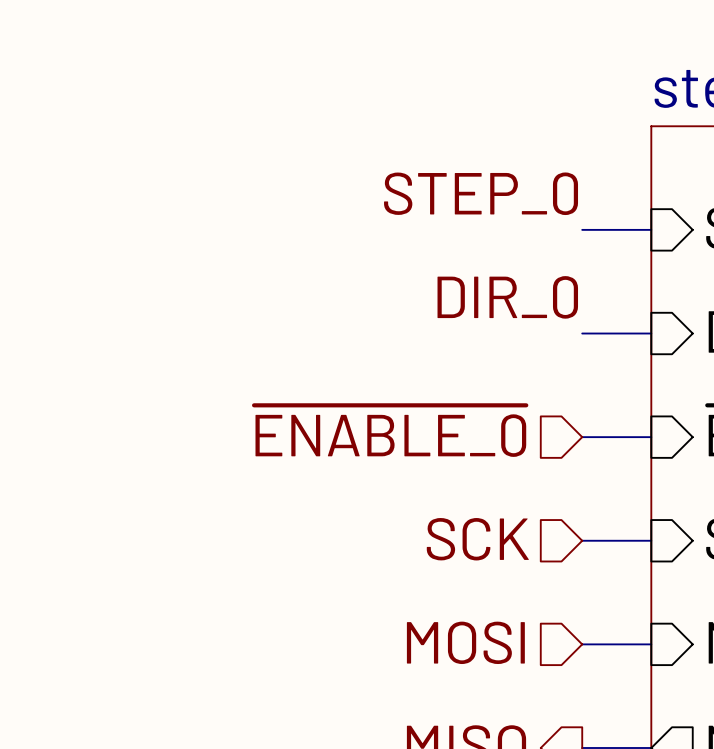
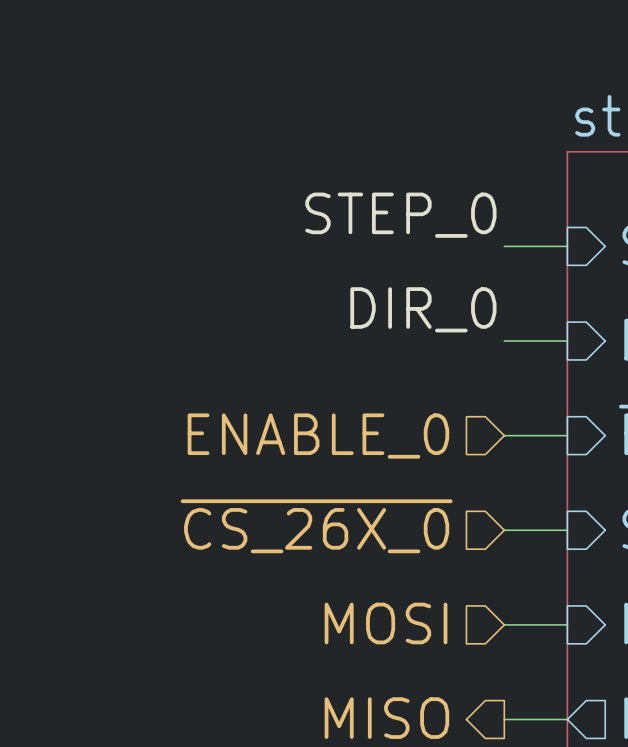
hierarchical label: ~{ENABLE_0} (390, 431) -> ENABLE_0 (318, 436)
hierarchical label: SCK (477, 539) -> ~{CS_26X_0} (316, 526)

